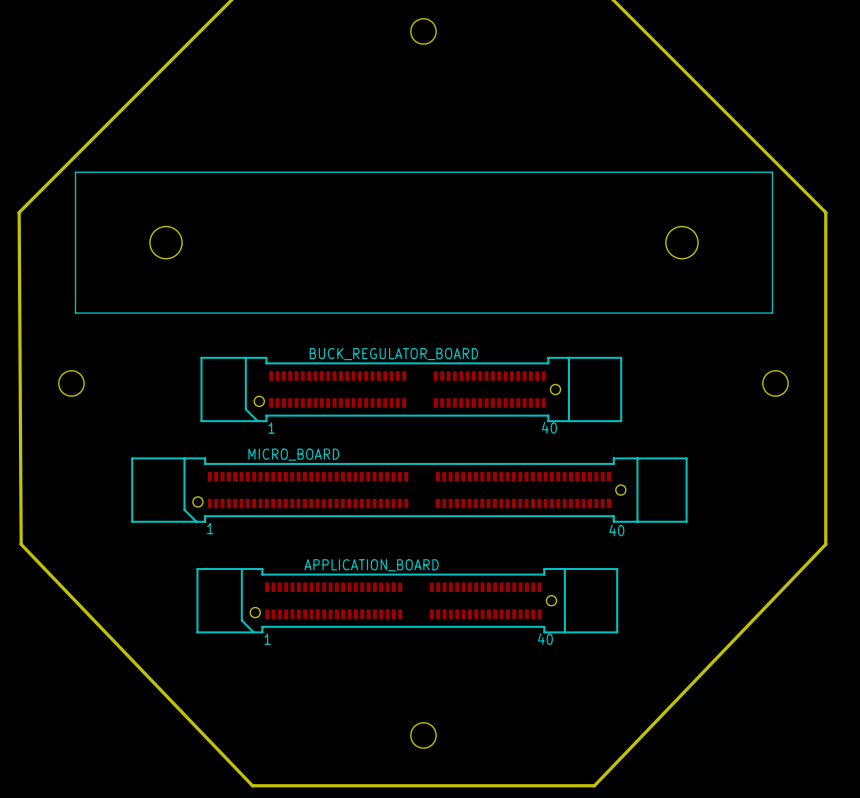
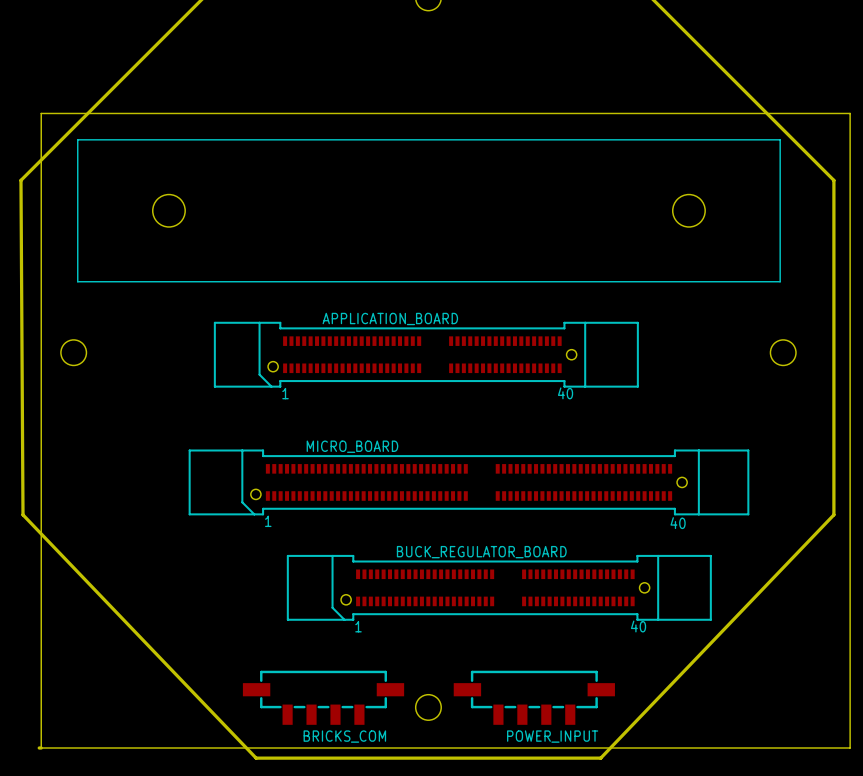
APPLICATION_BOARD: none -> (426, 354)
BUCK_REGULATOR_BOARD: (411, 389) -> none
MICRO_BOARD position: (409, 490) -> (469, 482)
APPLICATION_BOARD: (407, 600) -> none
BUCK_REGULATOR_BOARD: none -> (499, 587)
BRICKS_COM: none -> (323, 697)
POWER_INPUT: none -> (534, 697)
board edge: none -> (39, 748) (41, 748)
board edge: none -> (41, 748) (850, 748) (850, 113) (41, 113) (41, 748)

